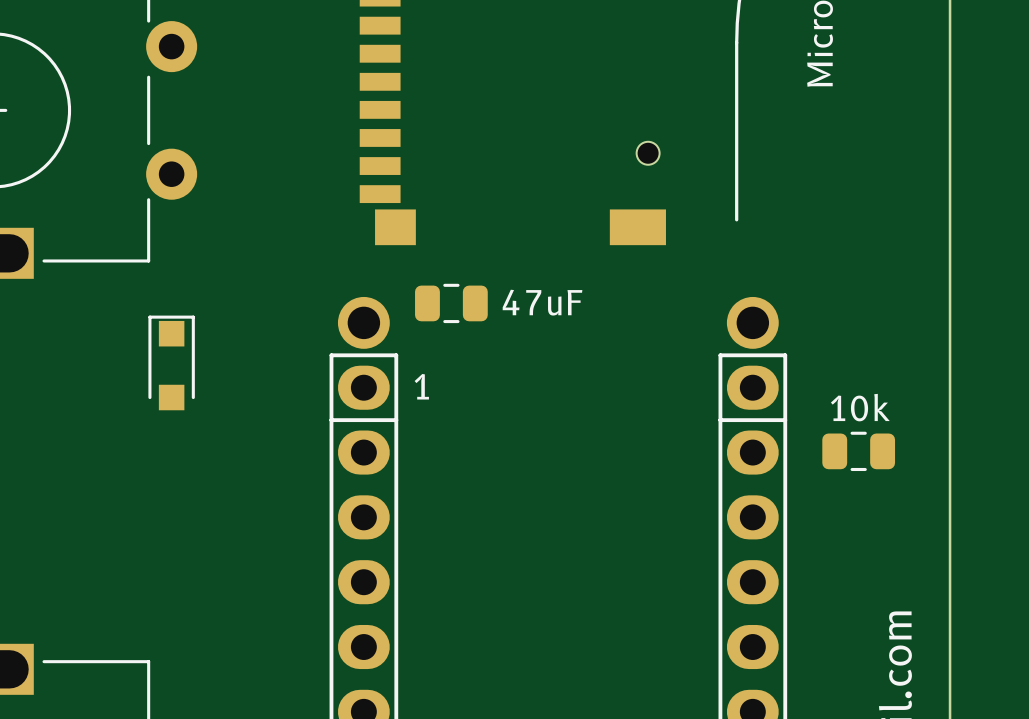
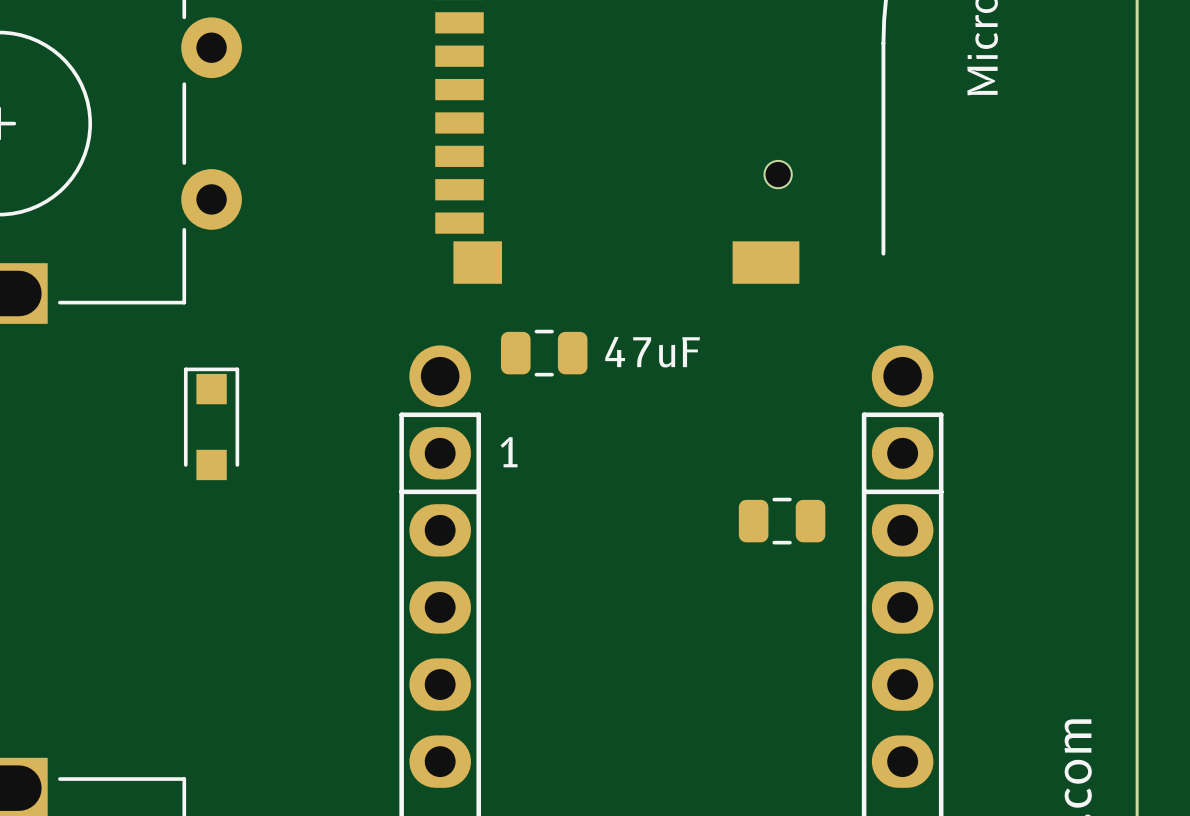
part: none -> (782, 521)
part: 10k (858, 451) -> none

